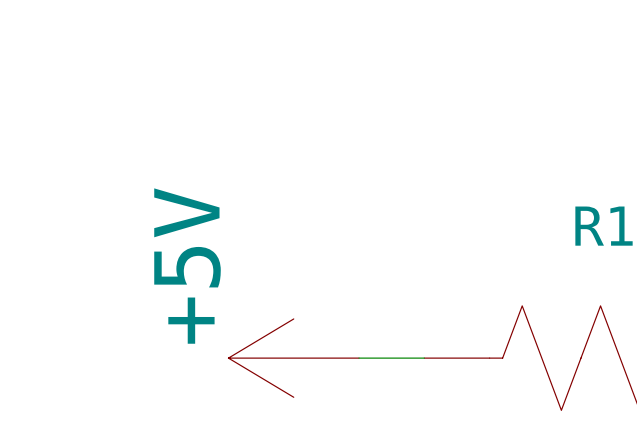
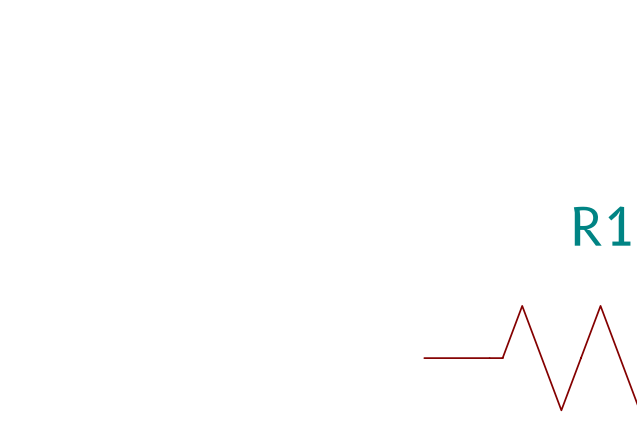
power symbol: +5V (293, 358) -> none
wire: (359, 358) (424, 358) -> none

